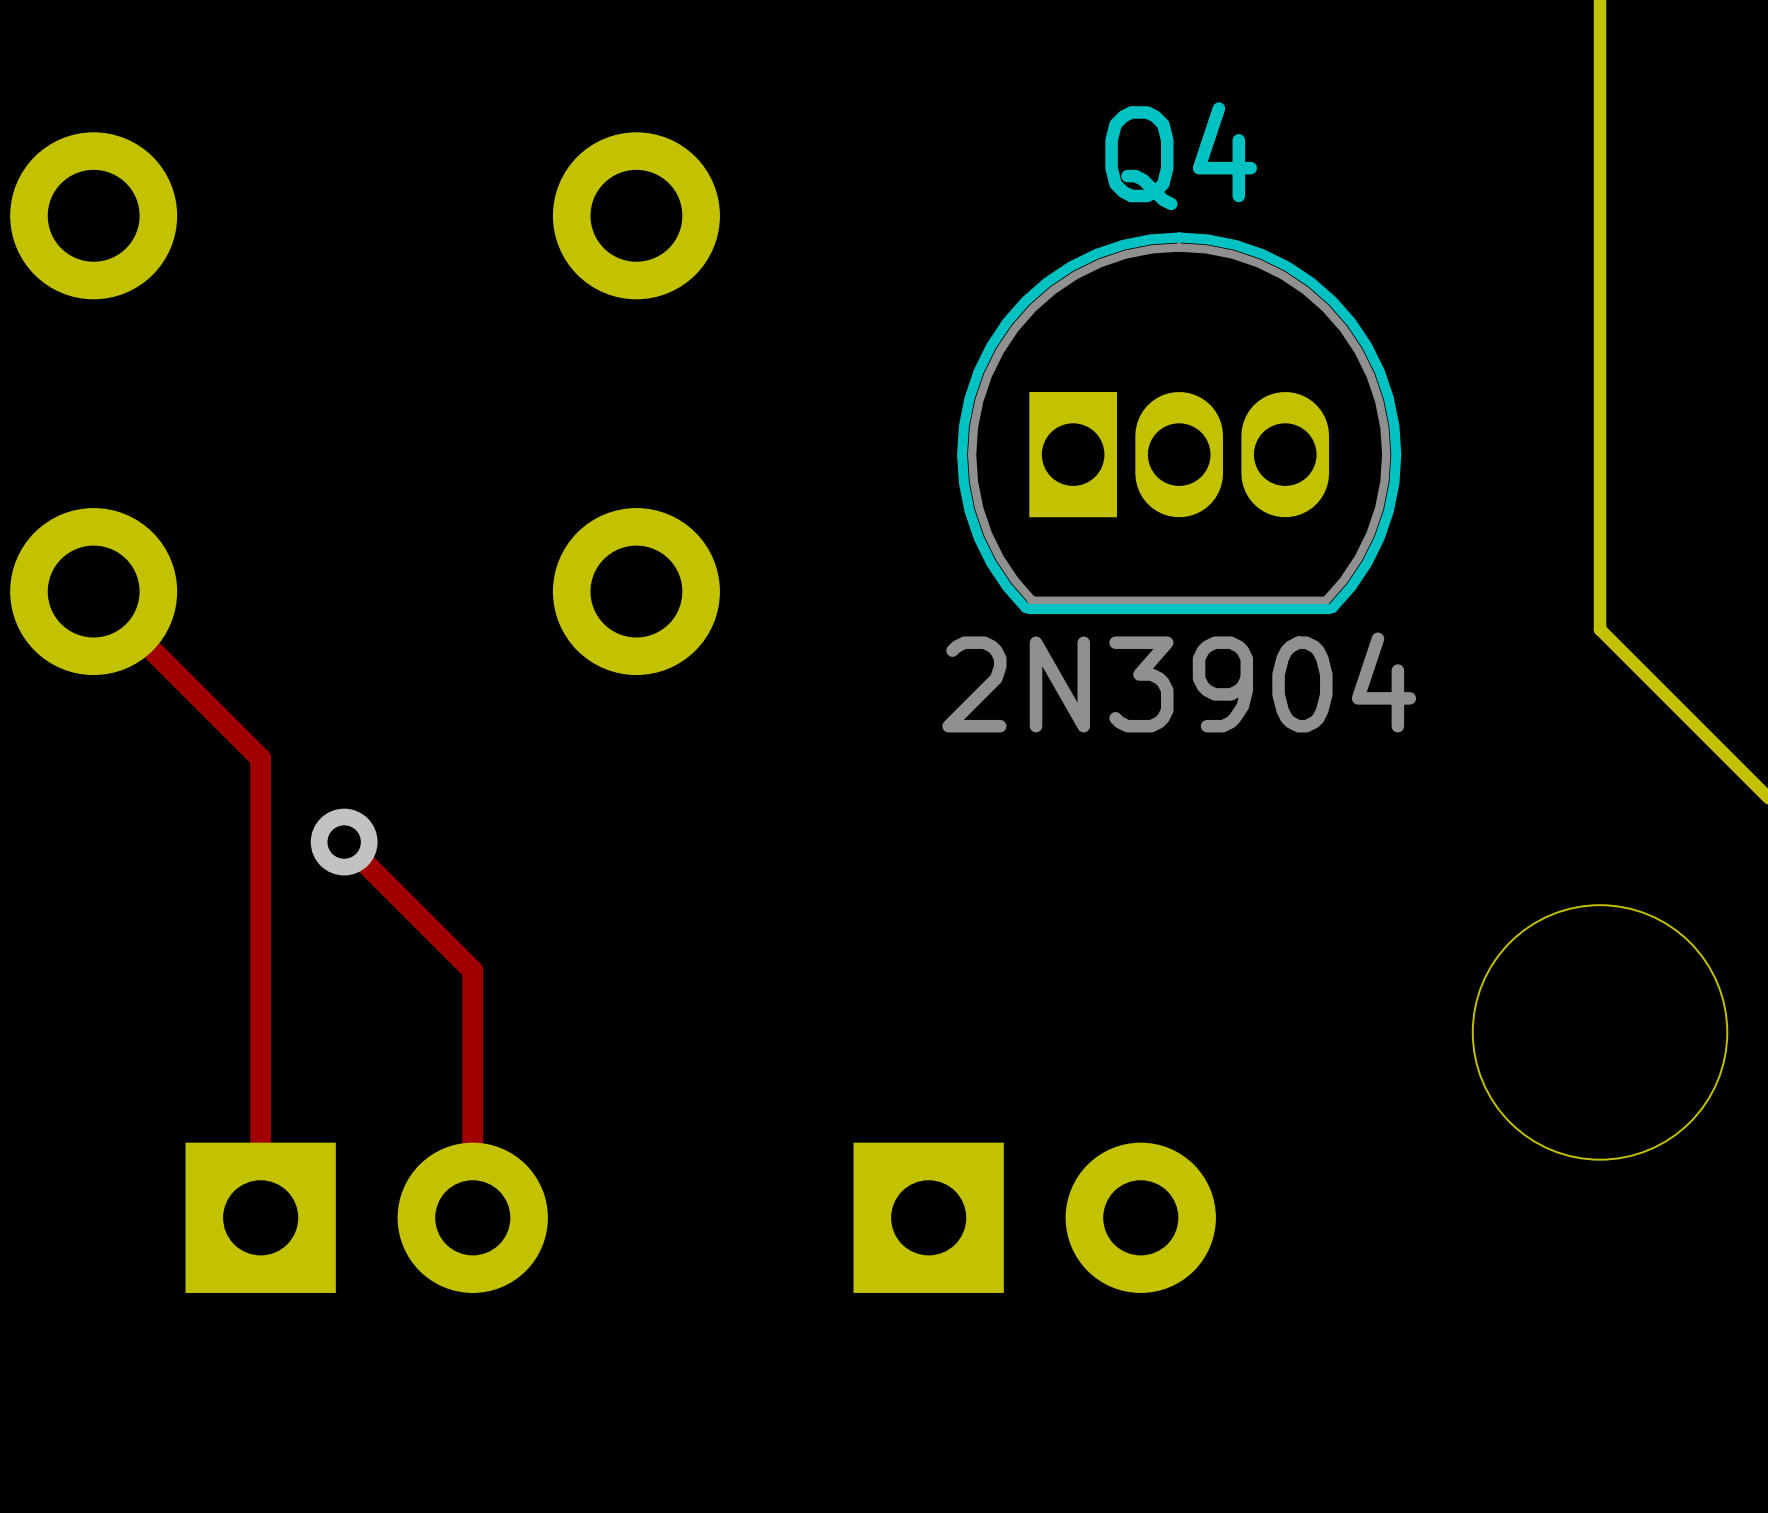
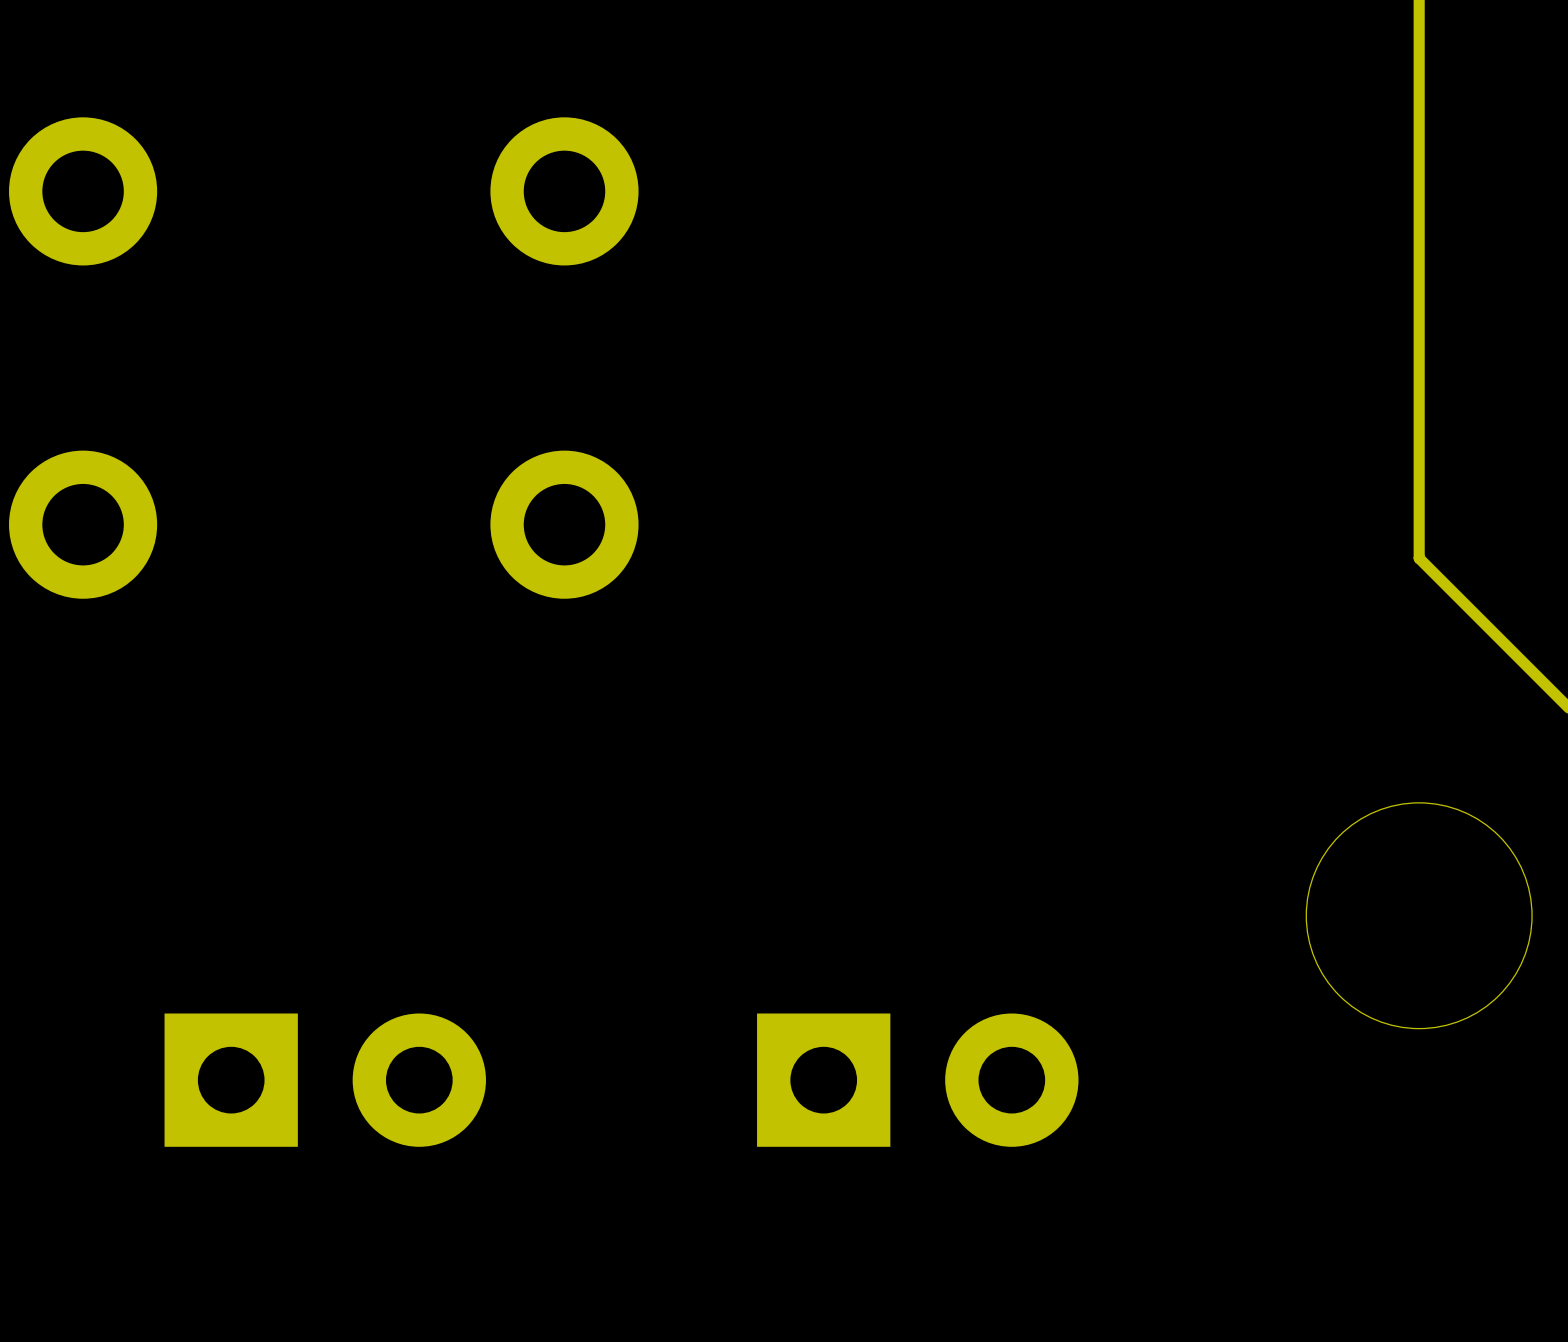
Q4: 2N3904 (1179, 423) -> none
track: (93, 591) (260, 758) (260, 1217) -> none
track: (344, 842) (472, 970) (472, 1217) -> none
via: (344, 842) -> none

